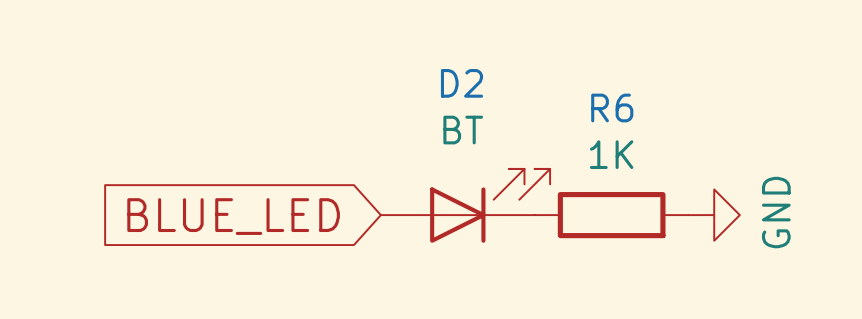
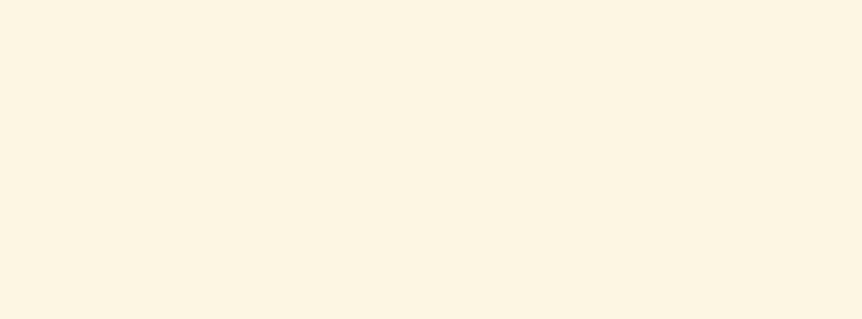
D2: BT (465, 205) -> none
R6: 1K (611, 215) -> none
power symbol: GND (714, 215) -> none
global label: BLUE_LED (233, 216) -> none

